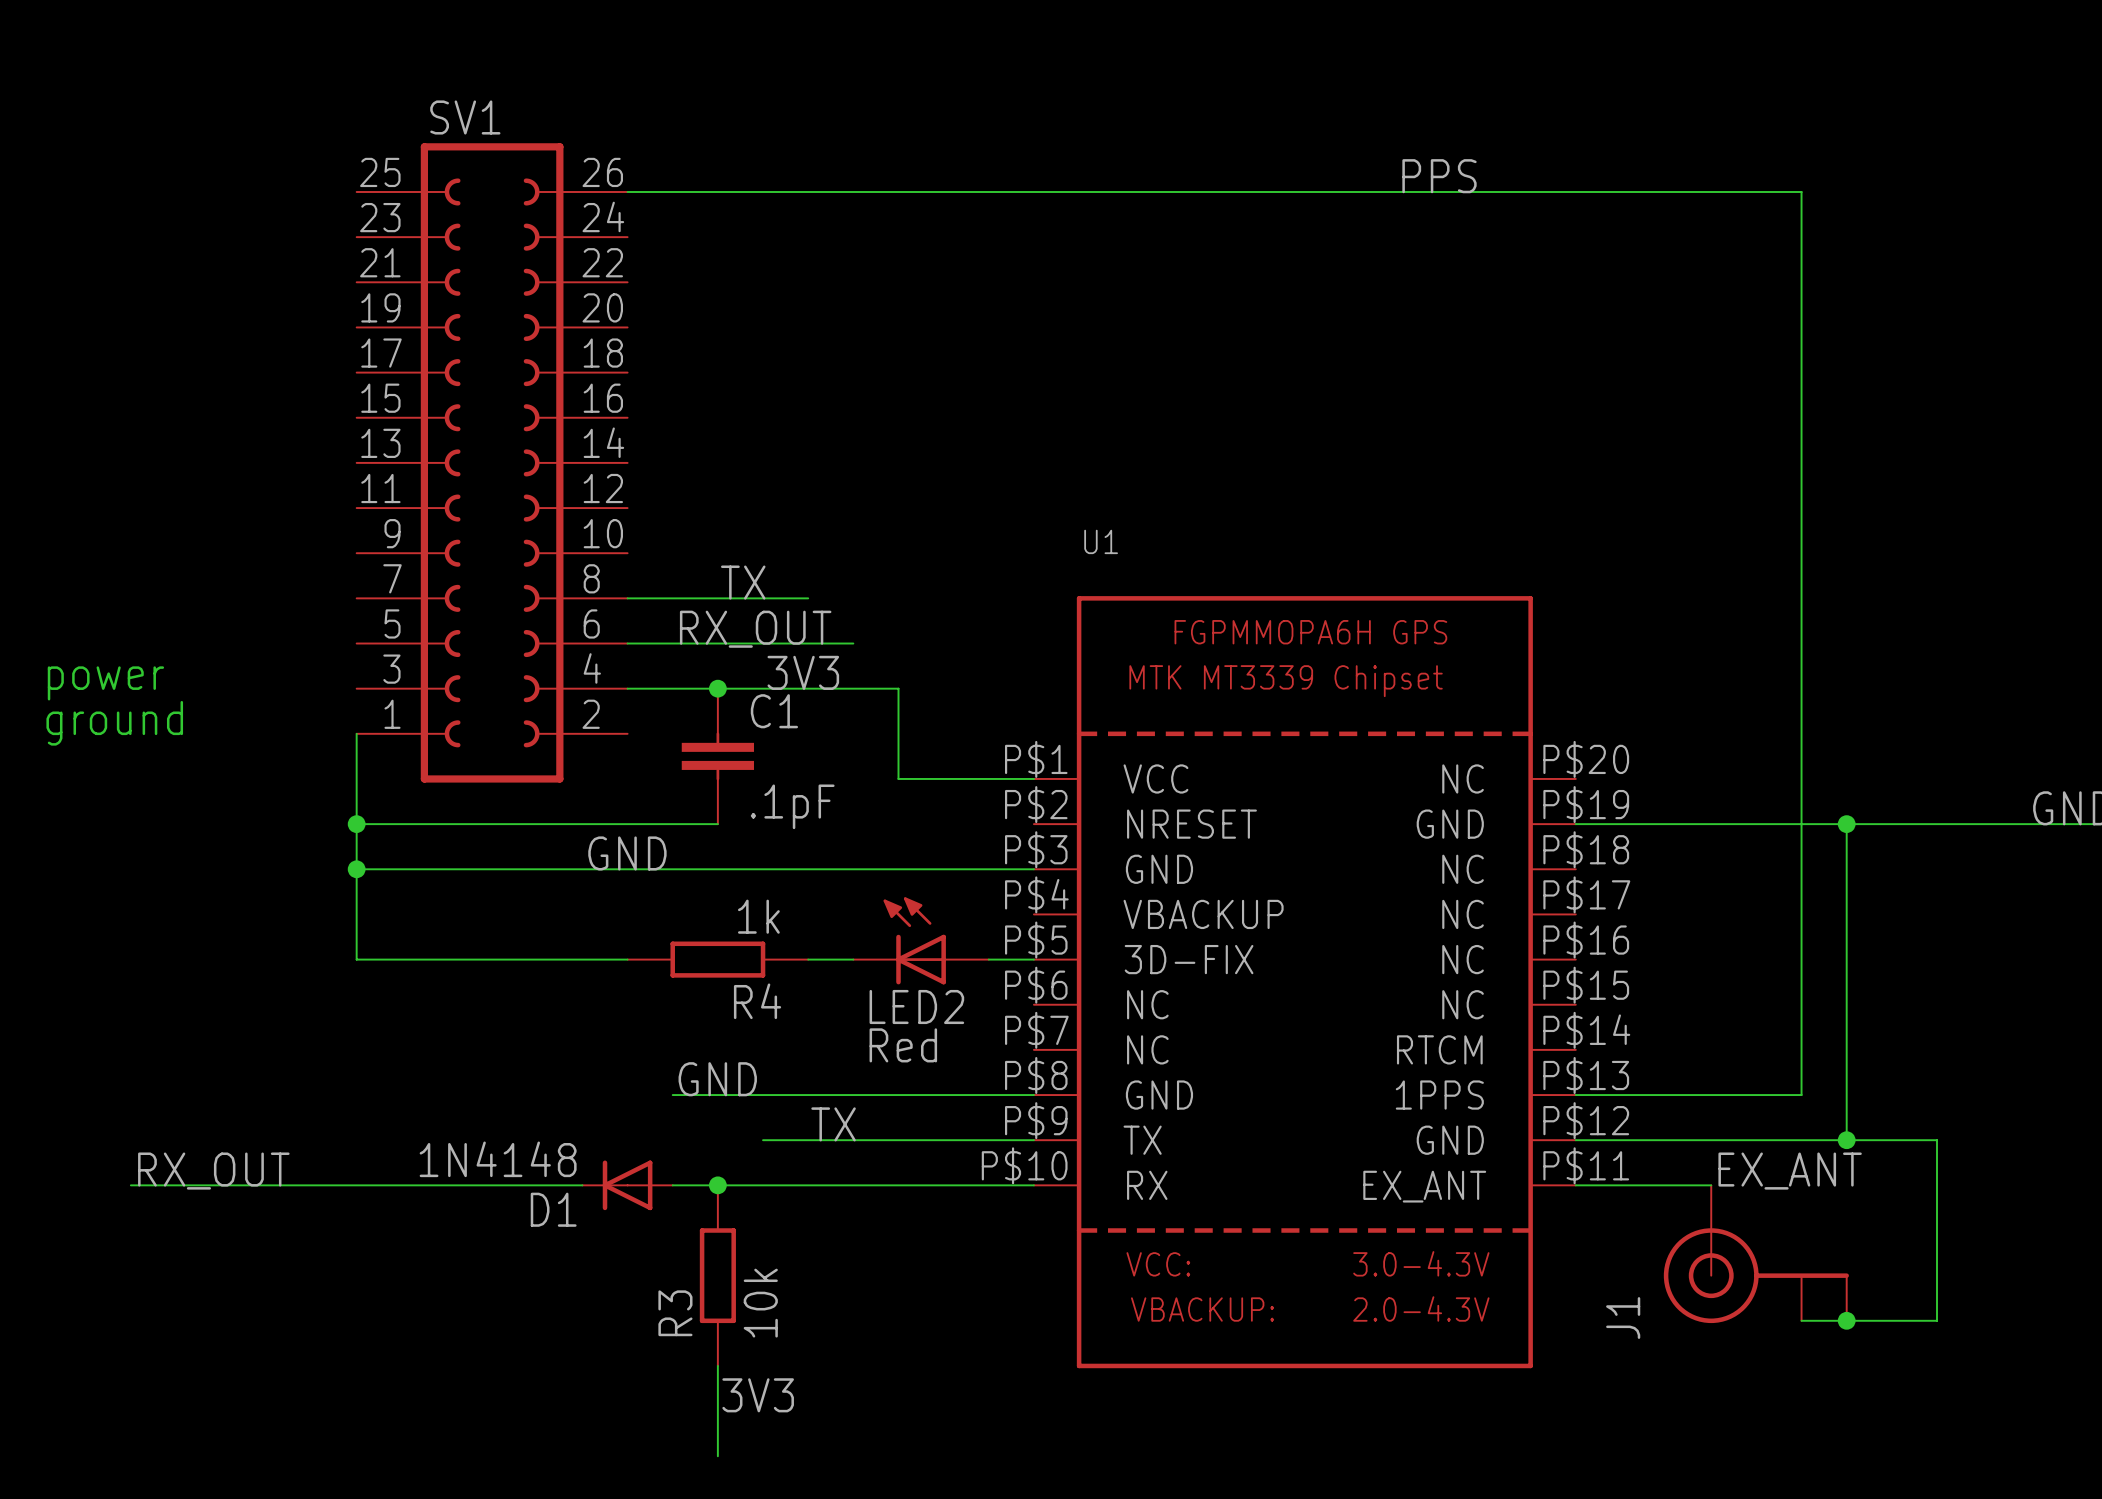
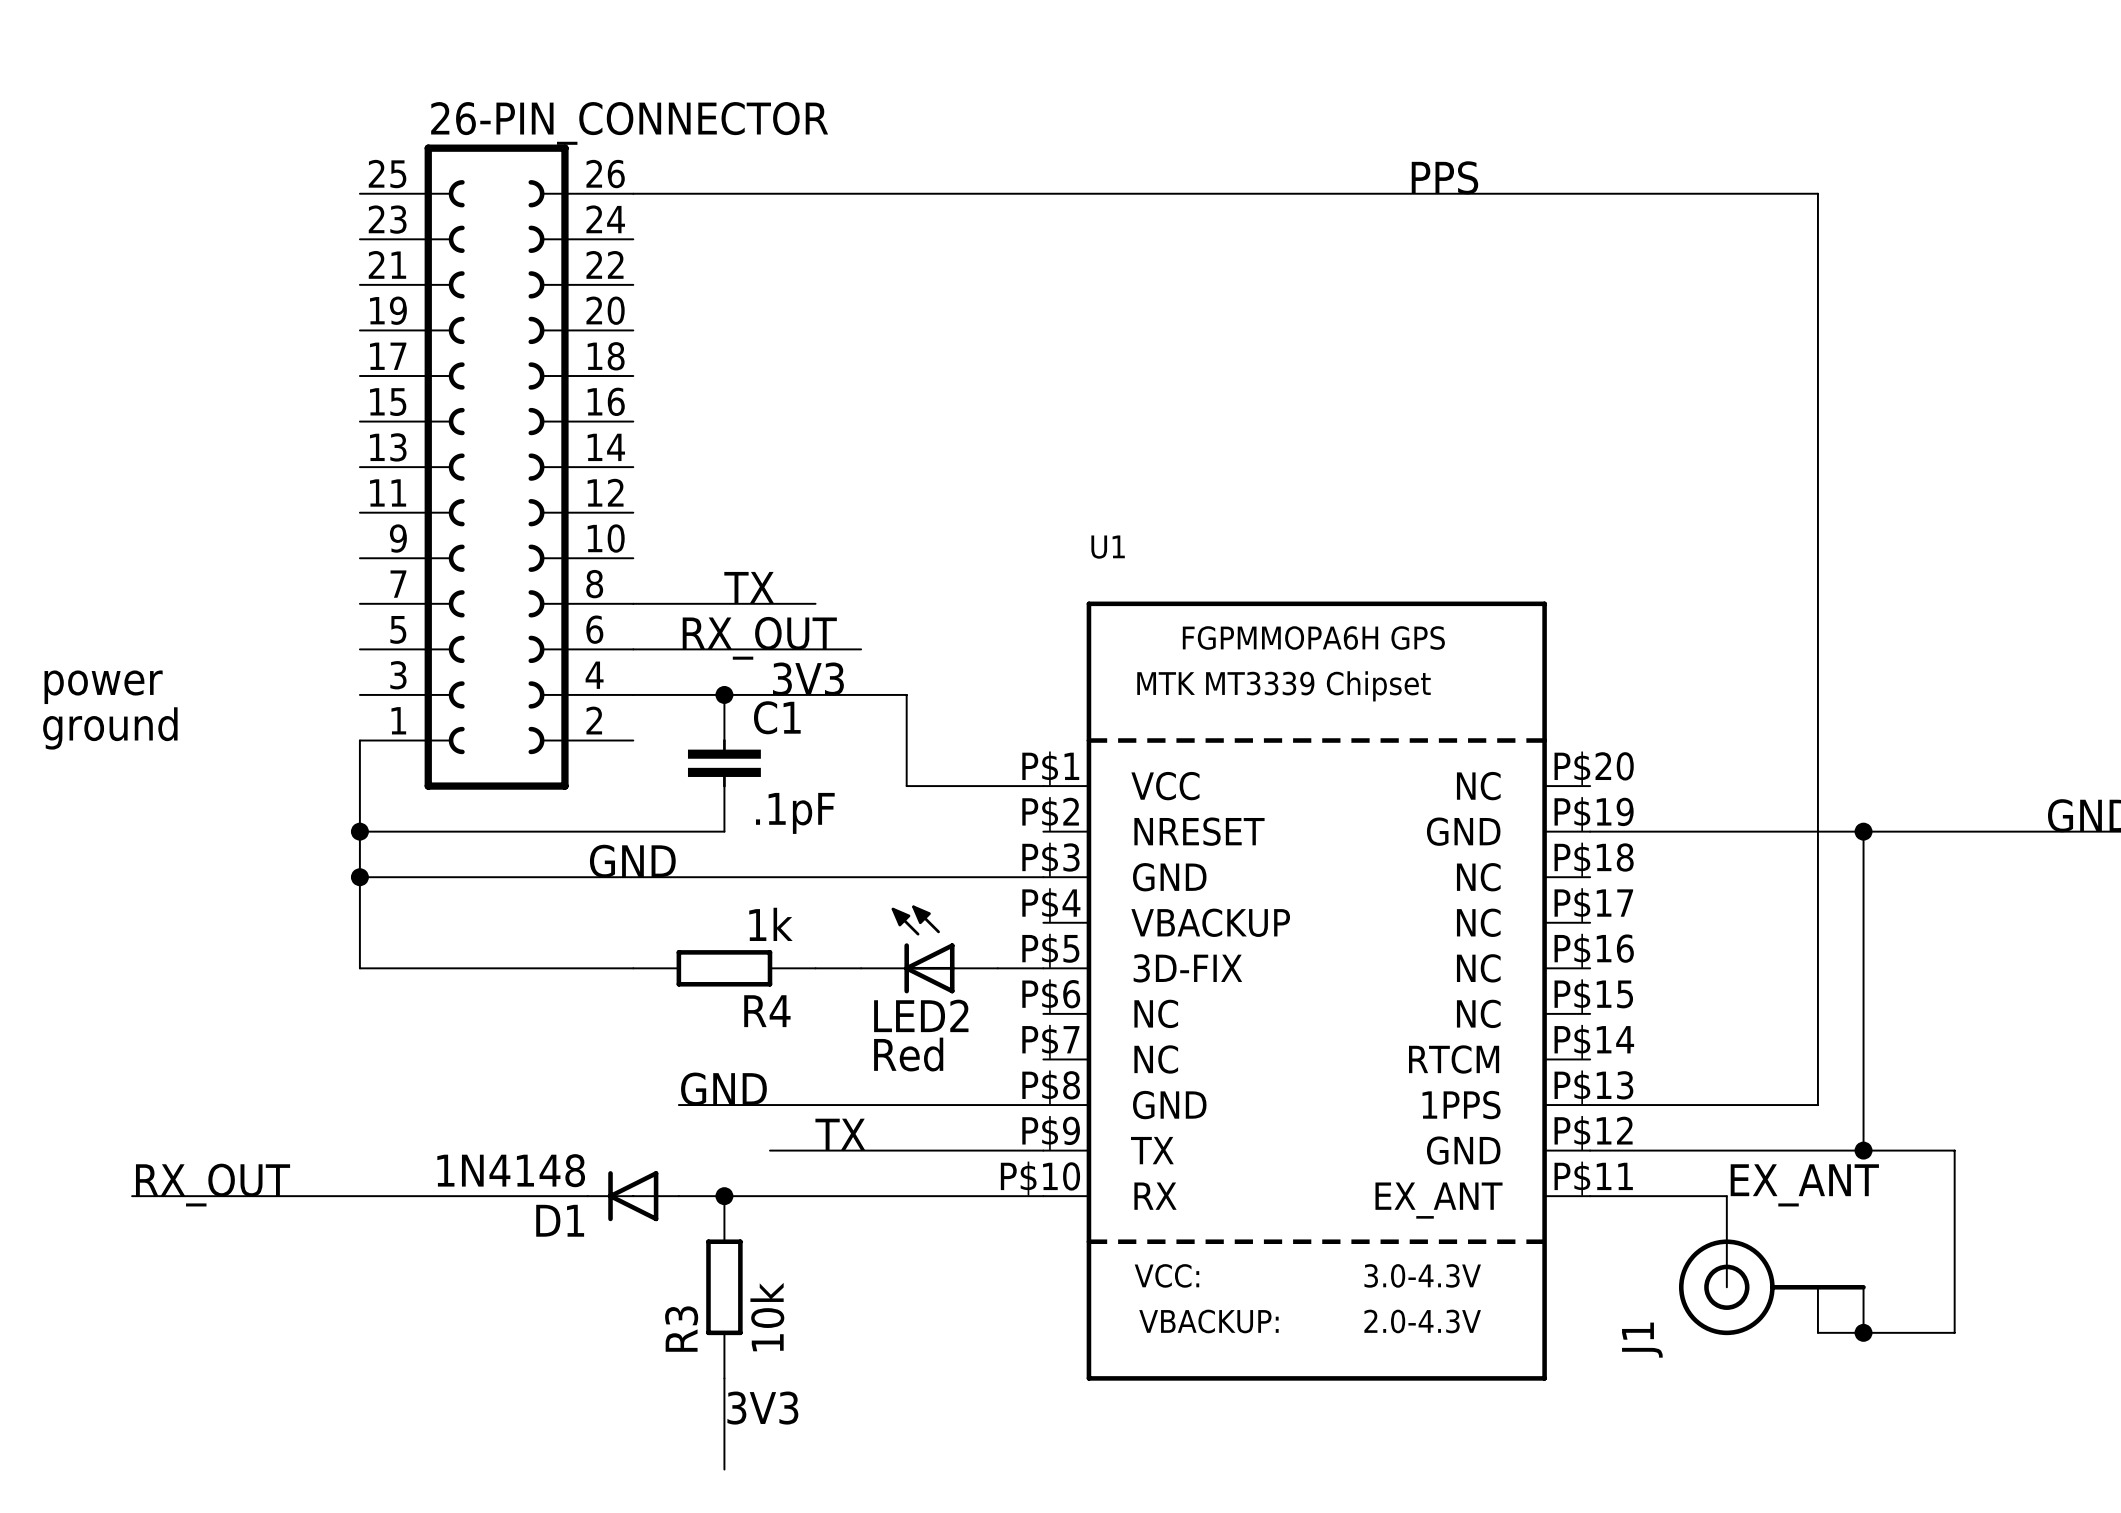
SV1 name: SV1 (465, 117) -> 26-PIN_CONNECTOR (629, 123)

